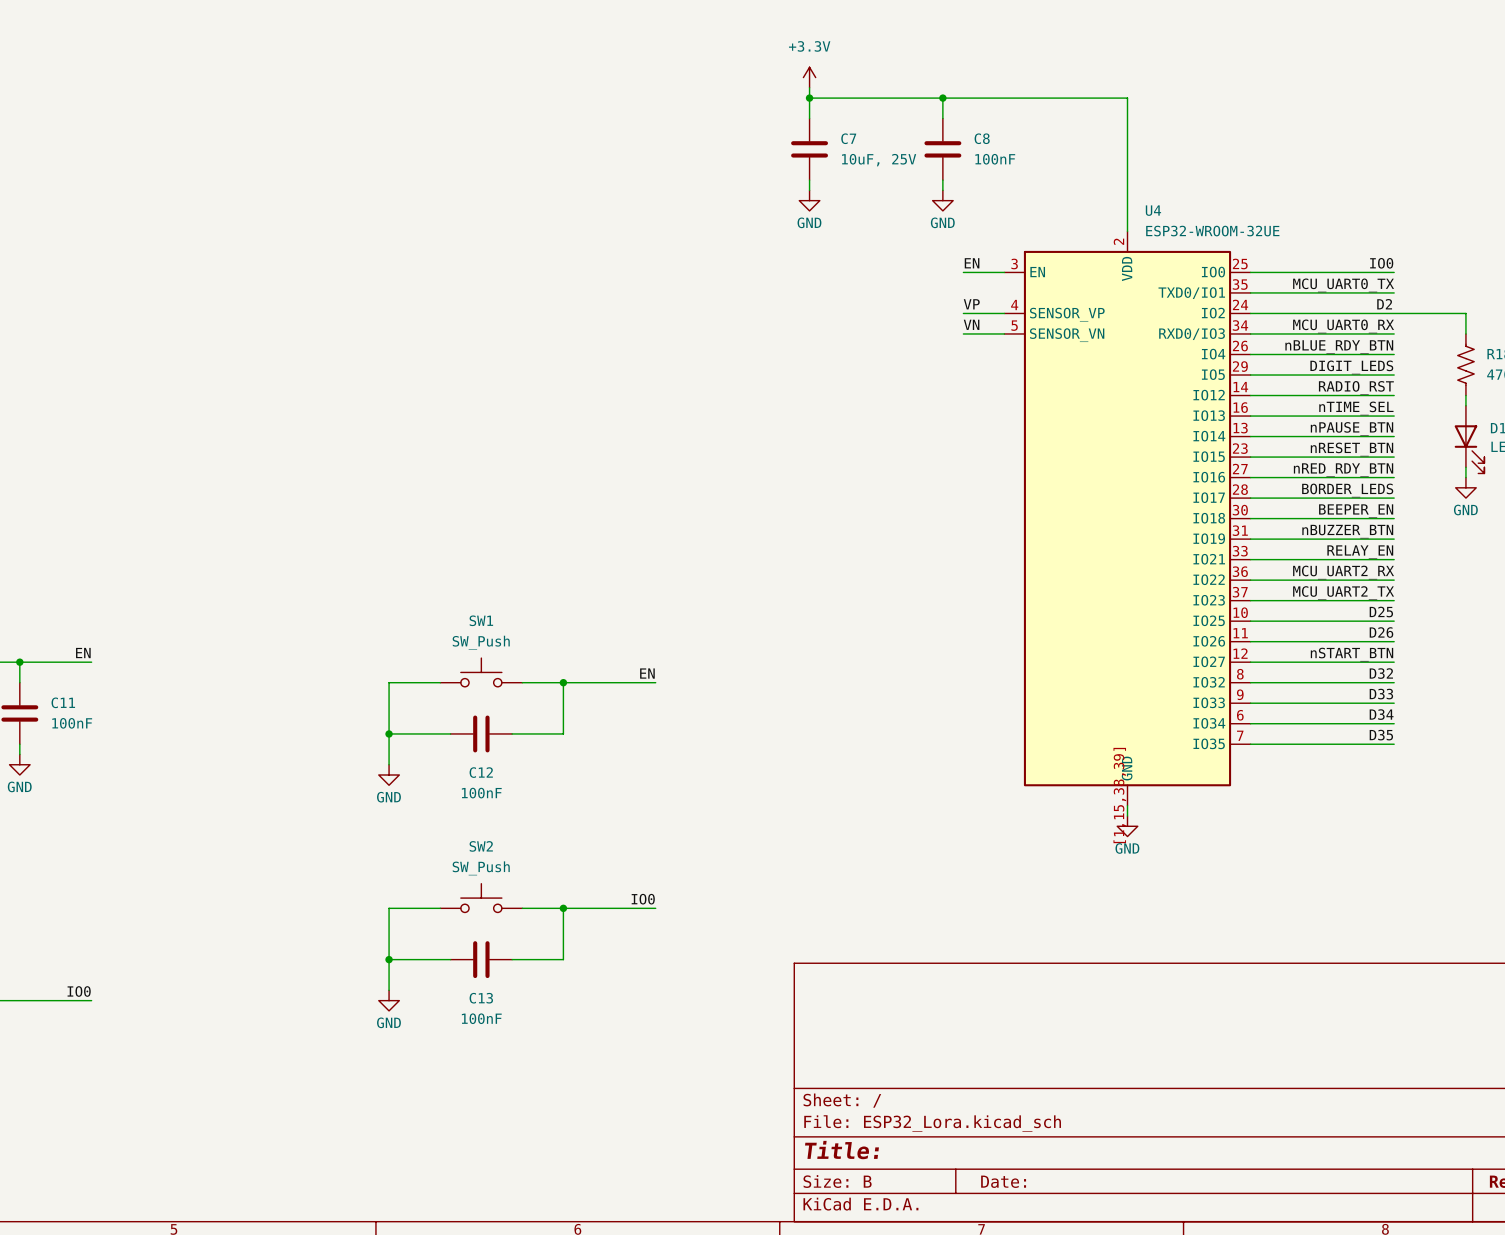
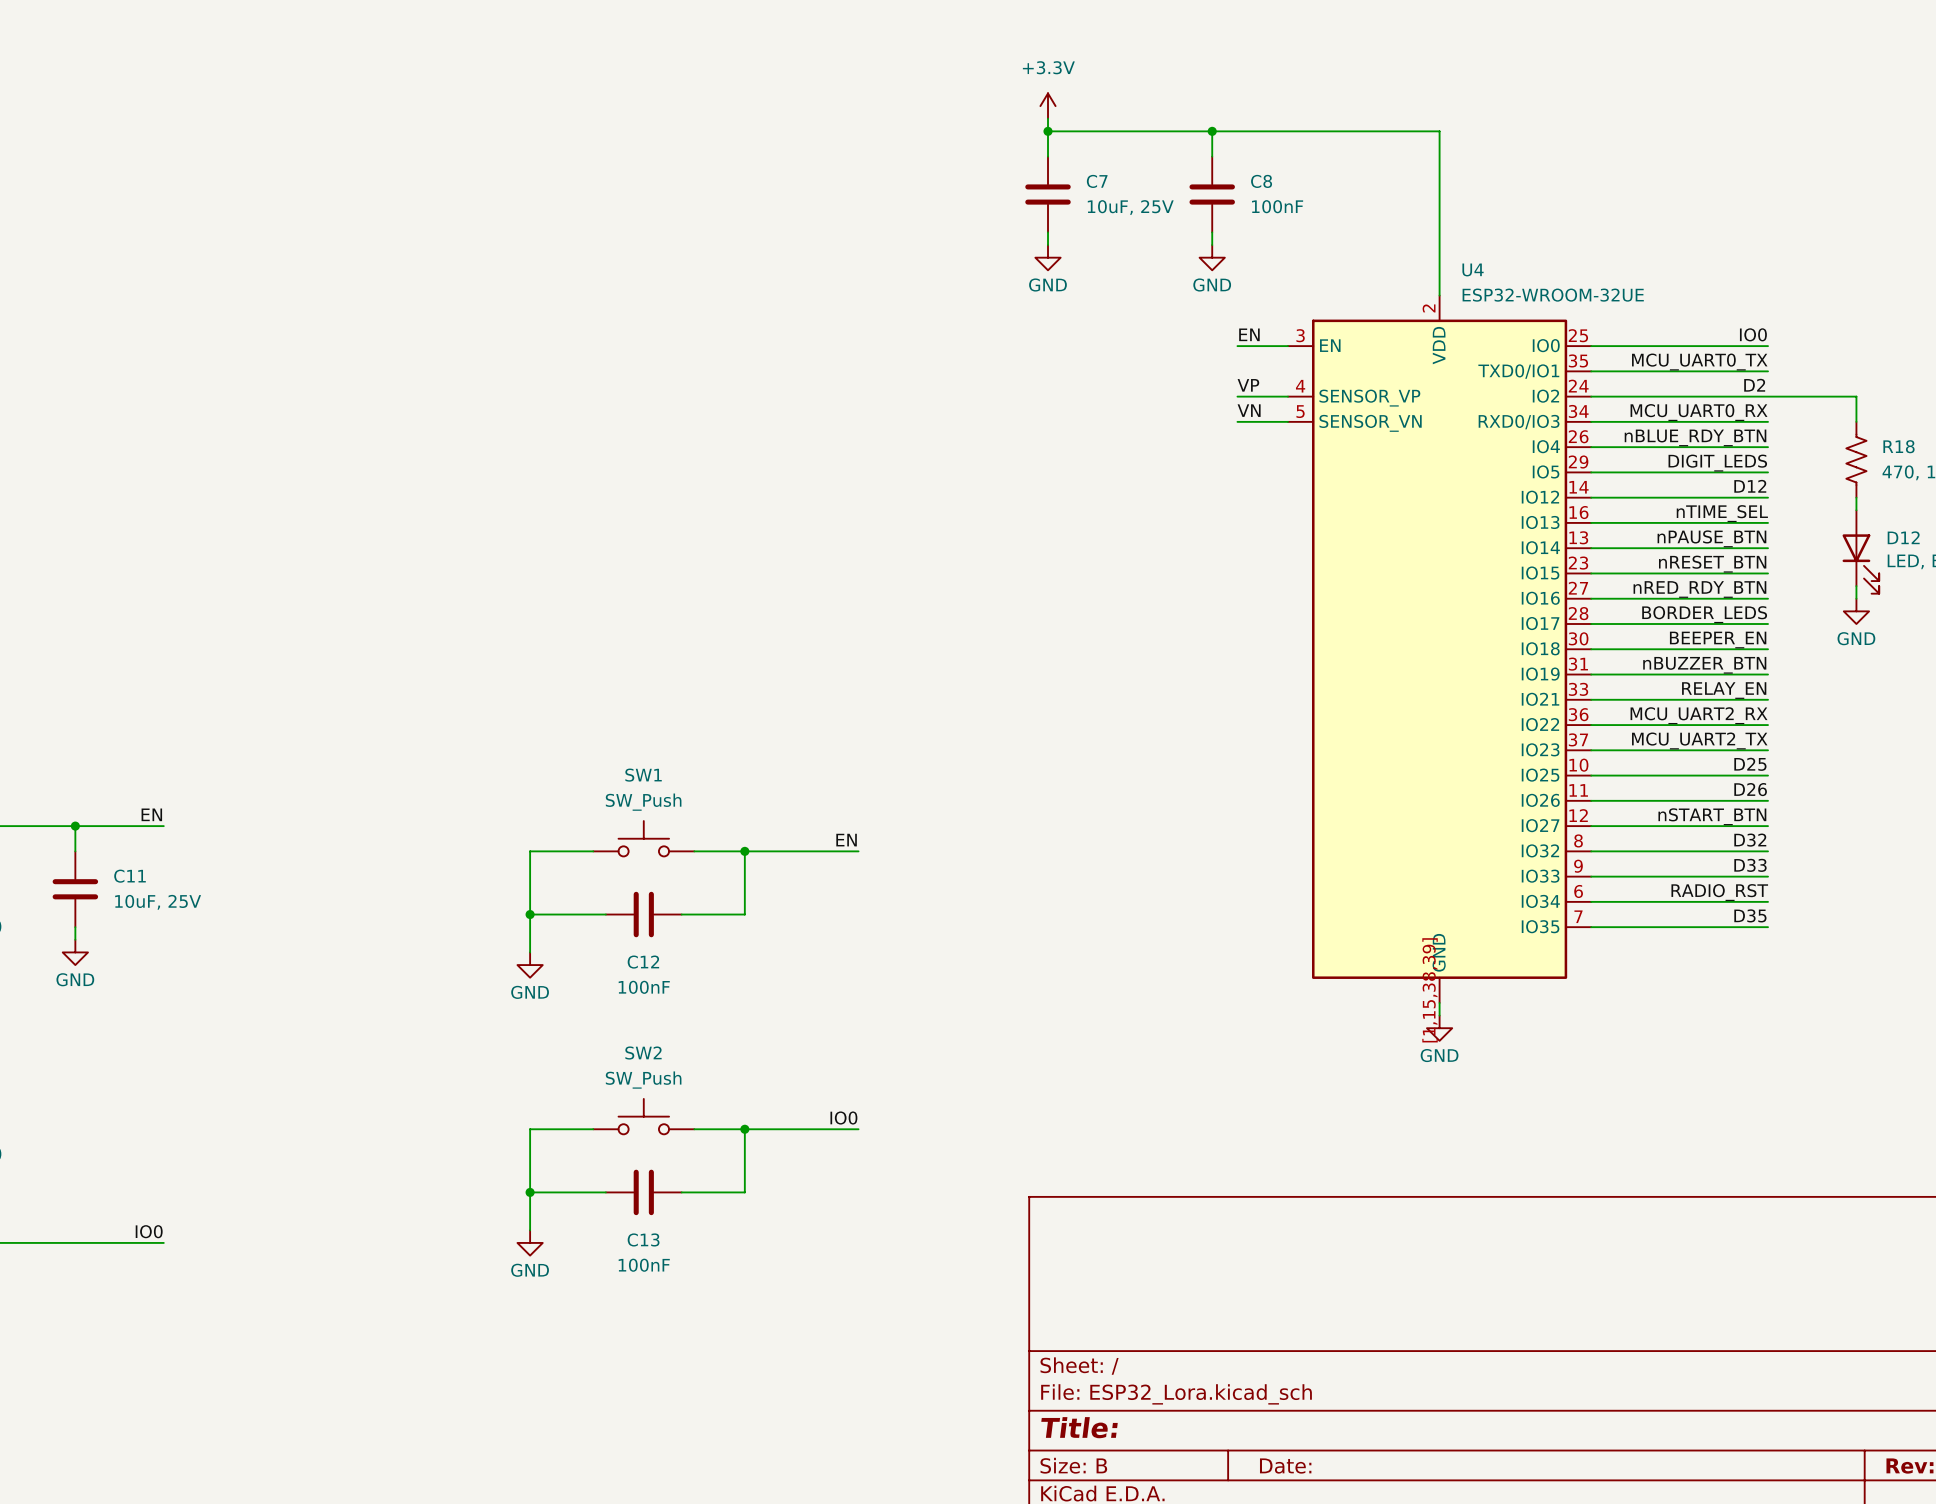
label: RADIO_RST (1356, 387) -> D12 (1750, 486)
label: D34 (1381, 714) -> RADIO_RST (1719, 892)
C11 value: 100nF (72, 723) -> 10uF, 25V (158, 902)

